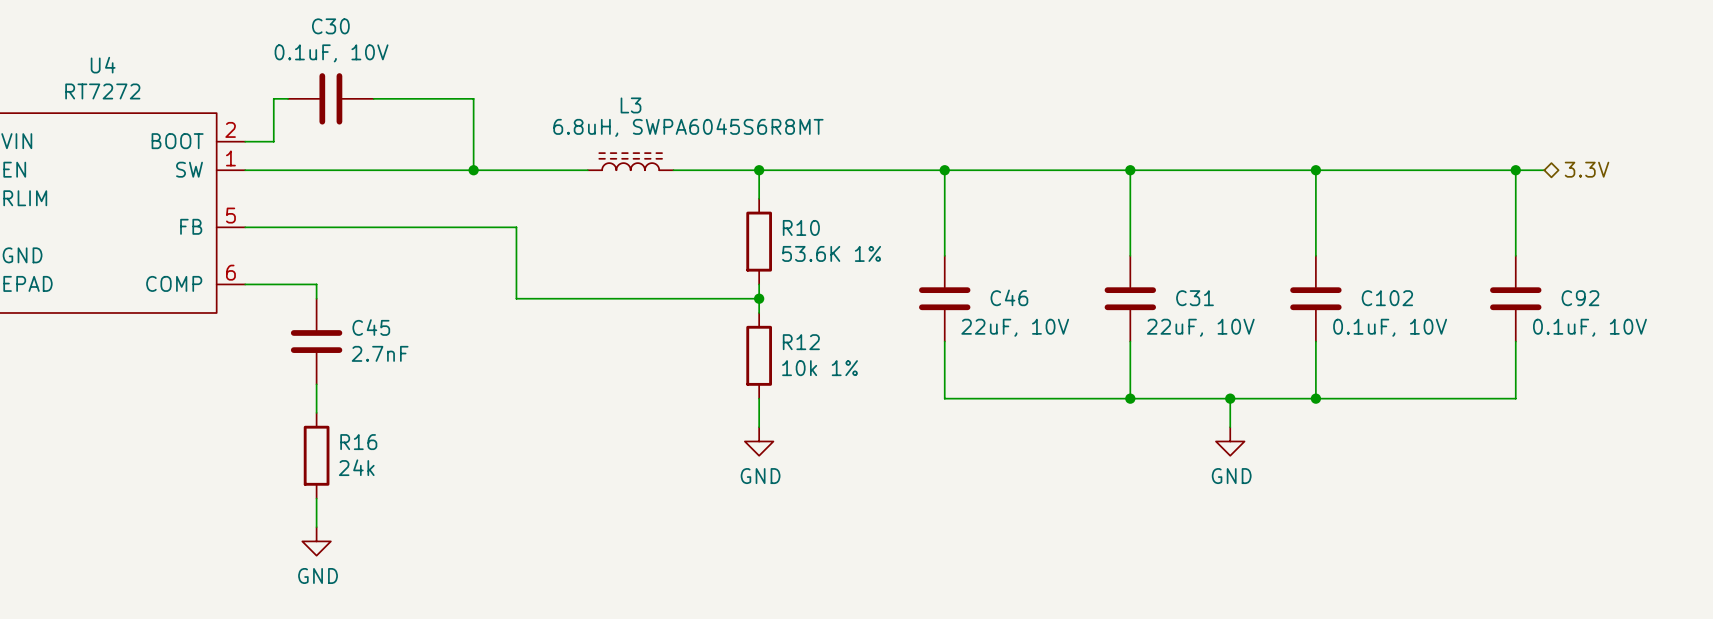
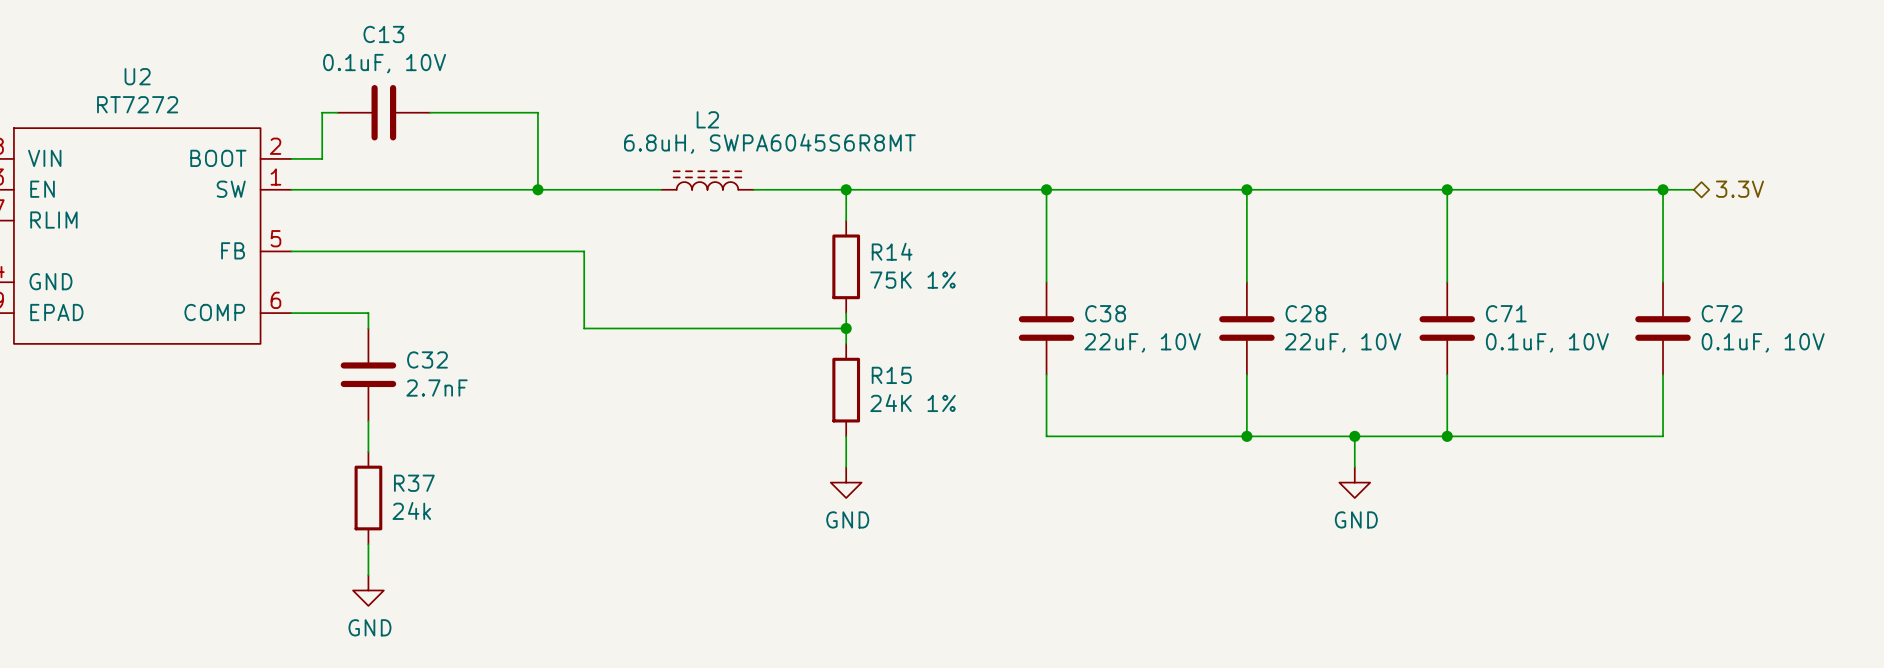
C30 name: C30 (330, 26) -> C13 (383, 34)
U4 name: U4 (103, 65) -> U2 (137, 76)
L3 name: L3 (631, 105) -> L2 (707, 119)
R10 name: R10 (801, 227) -> R14 (892, 251)
R10 value: 53.6K 1% (831, 253) -> 75K 1% (913, 280)
C46 name: C46 (1009, 297) -> C38 (1105, 313)
C31 name: C31 (1195, 298) -> C28 (1305, 313)
C102 name: C102 (1387, 298) -> C71 (1506, 313)
C92 name: C92 (1580, 298) -> C72 (1722, 313)
C45 name: C45 (371, 327) -> C32 (427, 359)
C46 value position: 22uF, 10V (1015, 327) -> 22uF, 10V (1142, 342)
C31 value position: 22uF, 10V (1200, 327) -> 22uF, 10V (1343, 342)
C102 value position: 0.1uF, 10V (1390, 327) -> 0.1uF, 10V (1547, 342)
C92 value position: 0.1uF, 10V (1589, 327) -> 0.1uF, 10V (1763, 342)
R12 name: R12 (801, 342) -> R15 (891, 375)
R12 value: 10k 1% (820, 368) -> 24K 1% (913, 403)
R16 name: R16 (358, 442) -> R37 (414, 483)

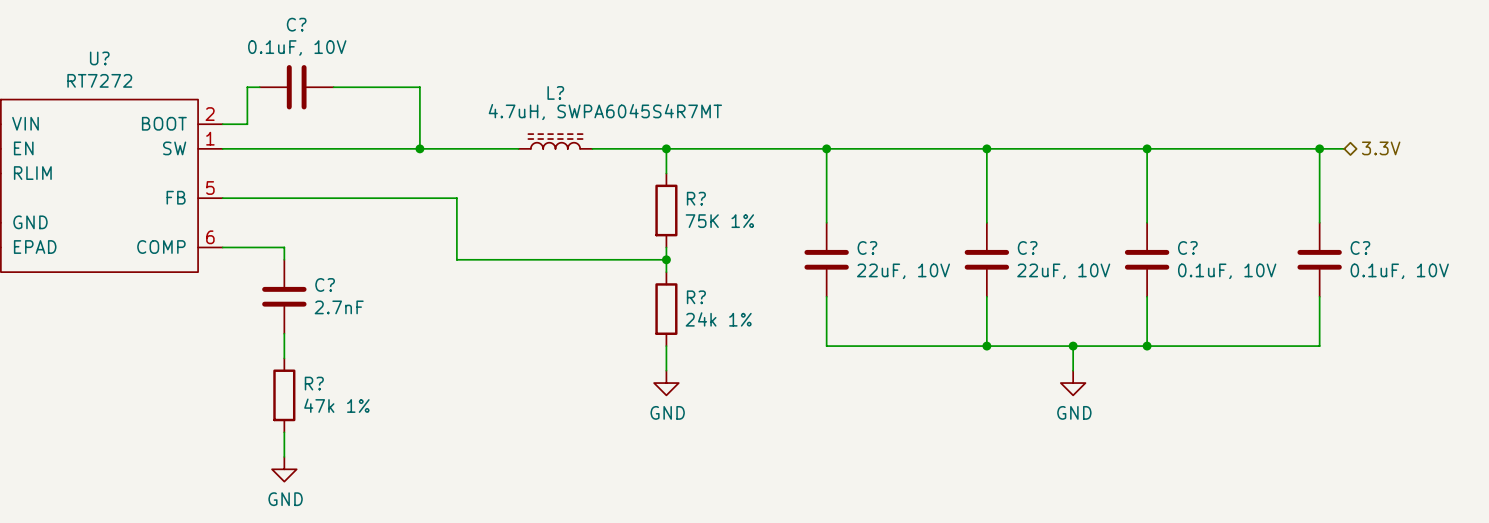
C13 name: C13 (383, 34) -> C? (296, 24)
U2 name: U2 (137, 76) -> U? (99, 58)
L2 name: L2 (707, 119) -> L? (555, 92)
L2 value: 6.8uH, SWPA6045S6R8MT (769, 143) -> 4.7uH, SWPA6045S4R7MT (605, 112)
R14 name: R14 (892, 251) -> R? (696, 198)
C38 name: C38 (1105, 313) -> C? (867, 247)
C28 name: C28 (1305, 313) -> C? (1027, 247)
C71 name: C71 (1506, 313) -> C? (1187, 247)
C72 name: C72 (1722, 313) -> C? (1360, 247)
C32 name: C32 (427, 359) -> C? (325, 284)
R15 name: R15 (891, 375) -> R? (696, 297)
R15 value: 24K 1% (913, 403) -> 24k 1% (718, 319)
R37 name: R37 (414, 483) -> R? (314, 383)
R37 value: 24k (411, 510) -> 47k 1% (336, 405)

